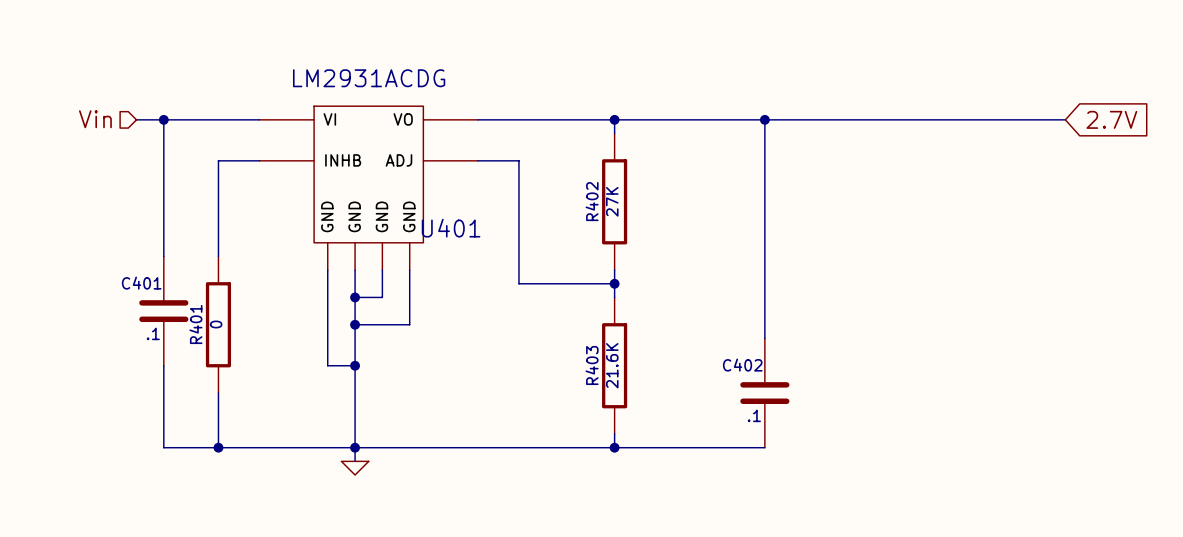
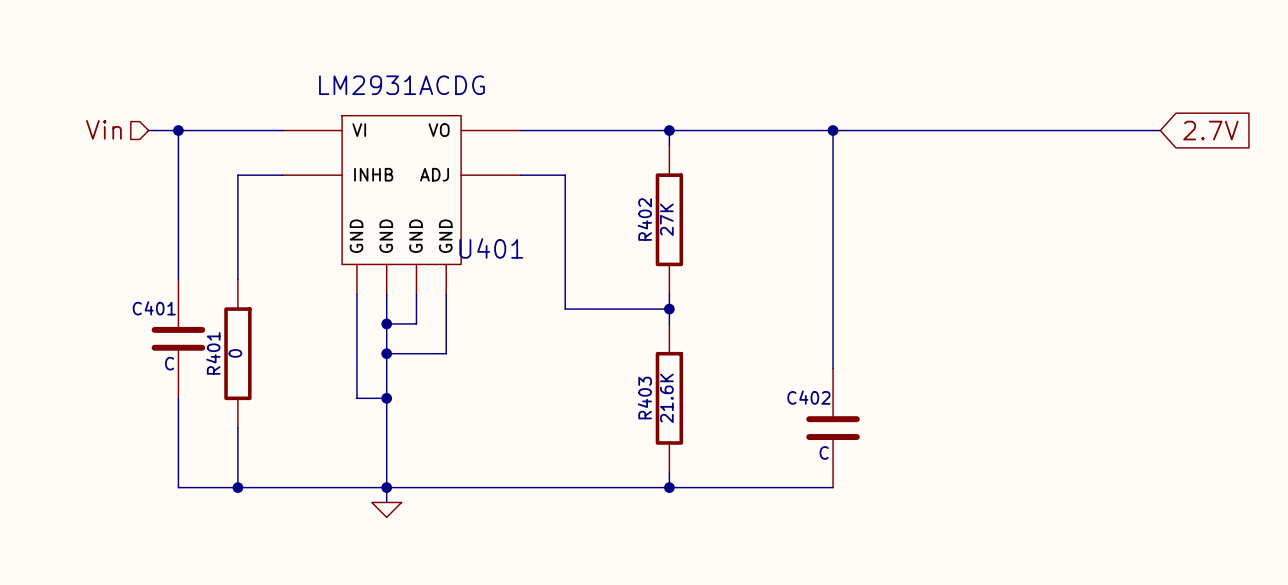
C401 value: .1 (153, 333) -> C (169, 363)
C402 value: .1 (754, 415) -> C (824, 452)

